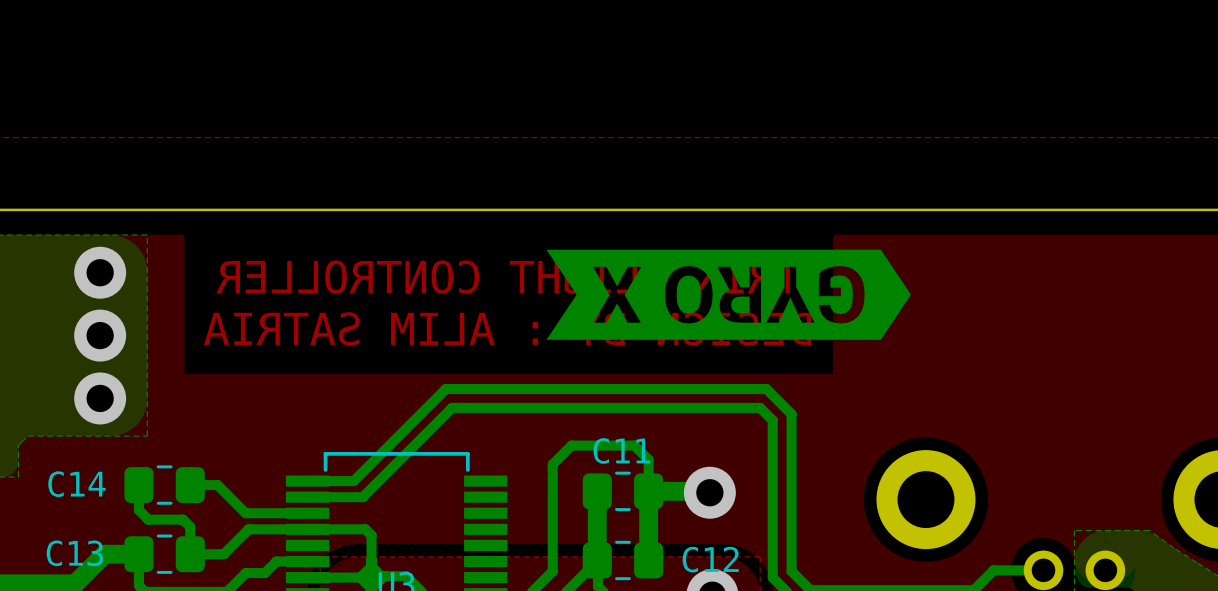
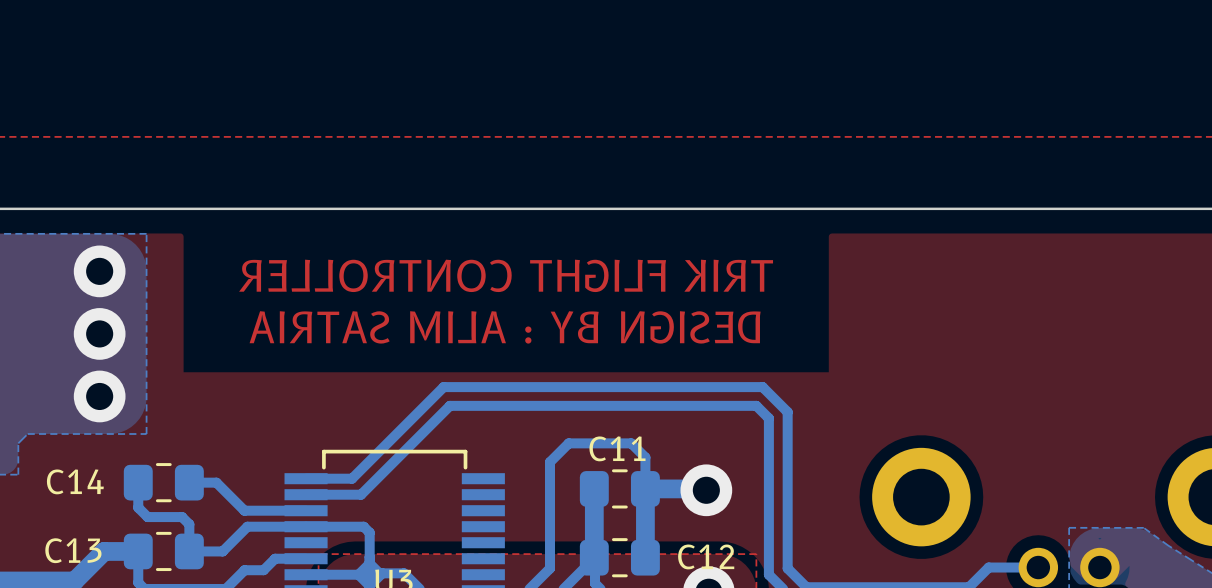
drawing: [546, 249, 911, 340] -> none

